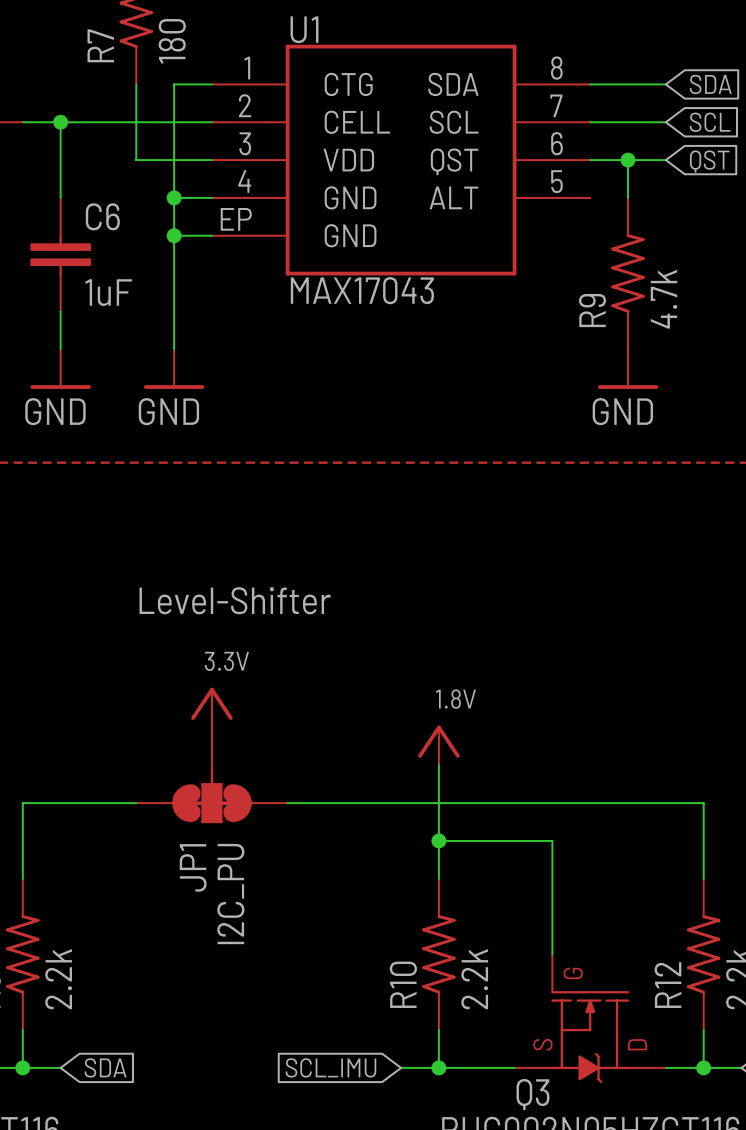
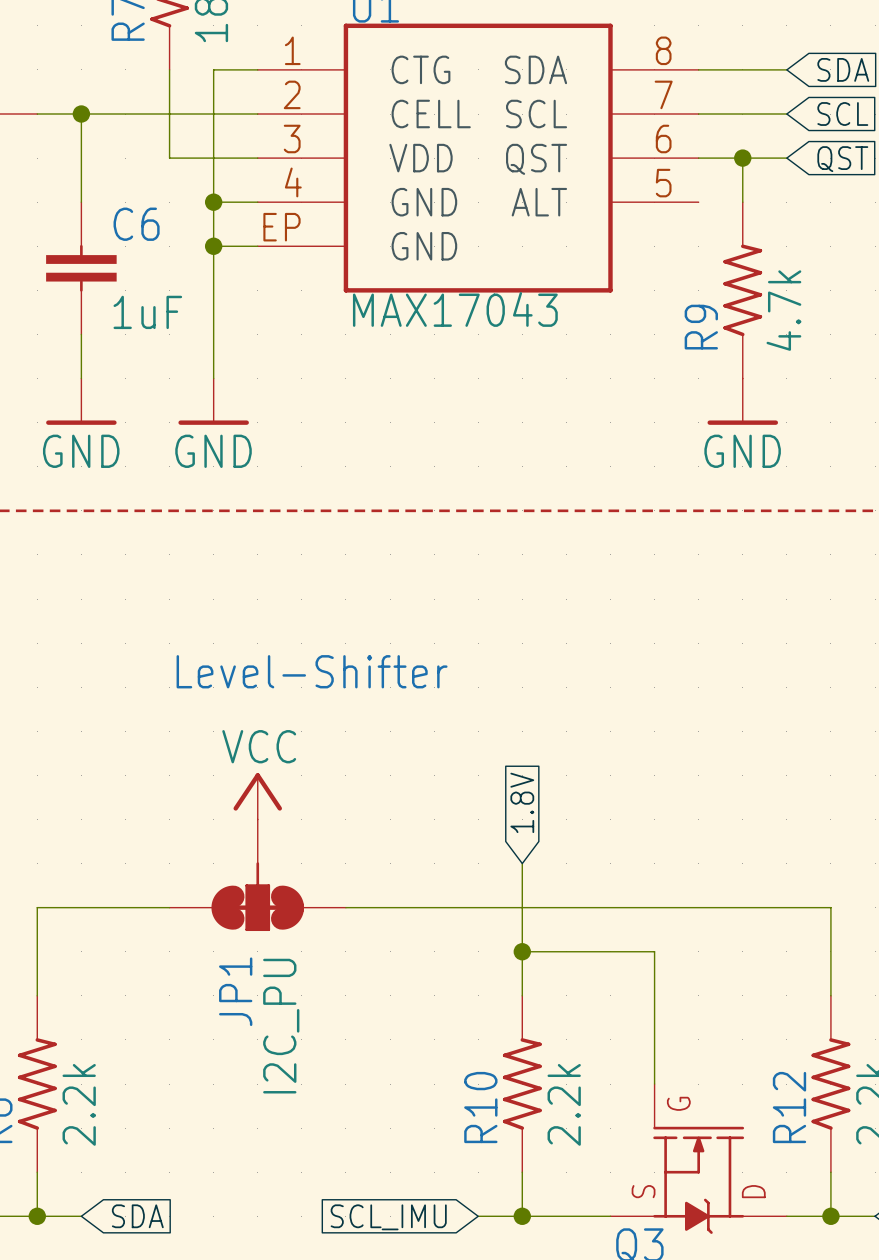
power symbol: 3.3V (211, 707) -> VCC (257, 796)
global label: none -> 1.8V (522, 802)
power symbol: 1.8V (438, 745) -> none

